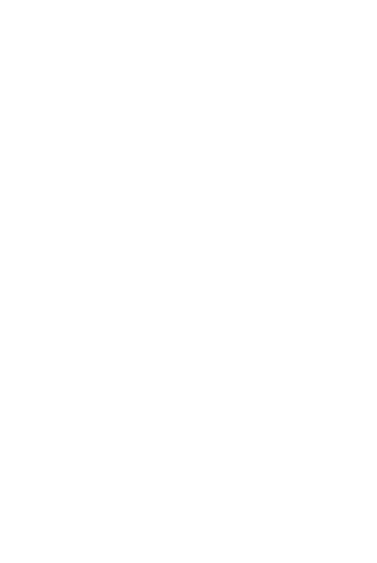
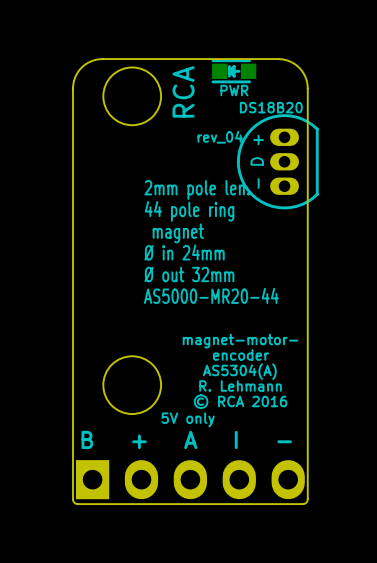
board edge: none -> (278, 59) (98, 59) (84, 65) (75, 77) (73, 88) (73, 499) (76, 503) (302, 504) (307, 501) (307, 88) (305, 77) (299, 67) (289, 61) (278, 59)
round board edge: none -> [102, 66, 163, 127]
part: none -> PWR (233, 71)
text: none -> RCA (183, 91)
text: none -> rev_04 (220, 137)
text: none -> - D + (257, 161)
part: none -> DS18B20 (277, 161)
text: none -> 2mm pole len. (197, 189)
text: none -> 44 pole ring (189, 211)
text: none -> magnet (178, 233)
text: none -> Ø in 24mm (184, 252)
text: none -> Ø out 32mm (189, 274)
text: none -> AS5000-MR20-44 (211, 295)
text: none -> magnet-motor- (240, 341)
text: none -> encoder (240, 354)
round board edge: none -> [102, 355, 163, 416]
text: none -> AS5304(A) (239, 371)
text: none -> R. Lehmann (240, 385)
text: none -> © RCA 2016 (240, 401)
text: none -> 5V only (188, 419)
text: none -> B + A I - (186, 439)
part: none -> (190, 479)

